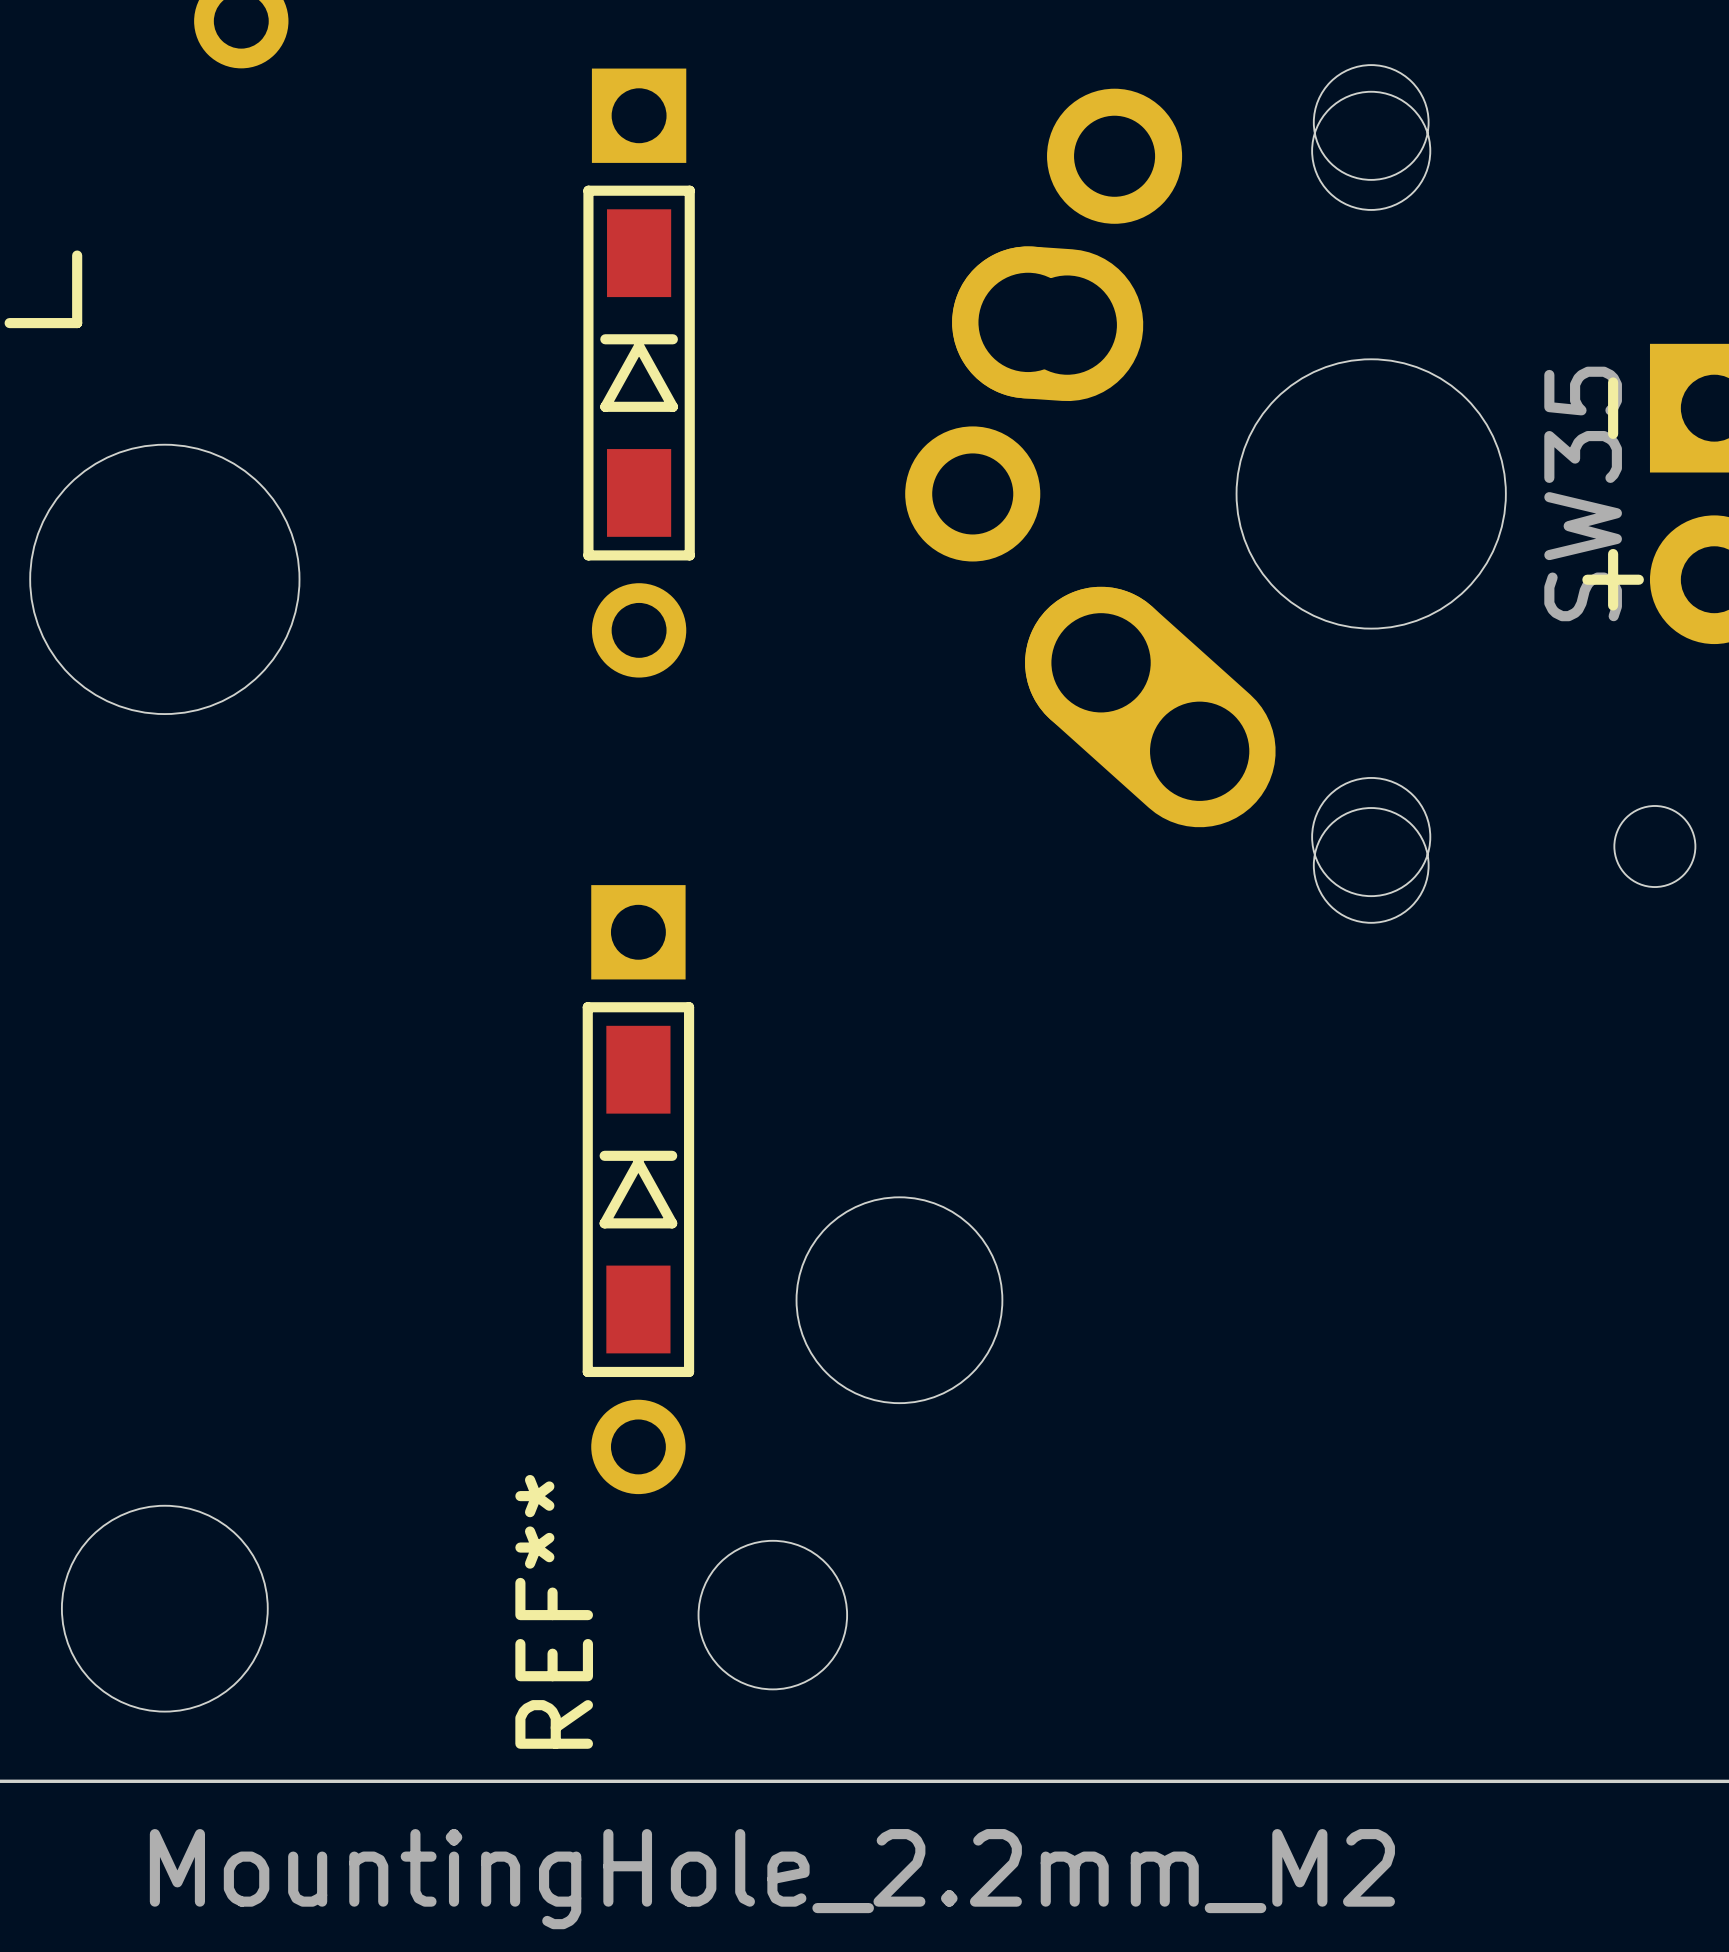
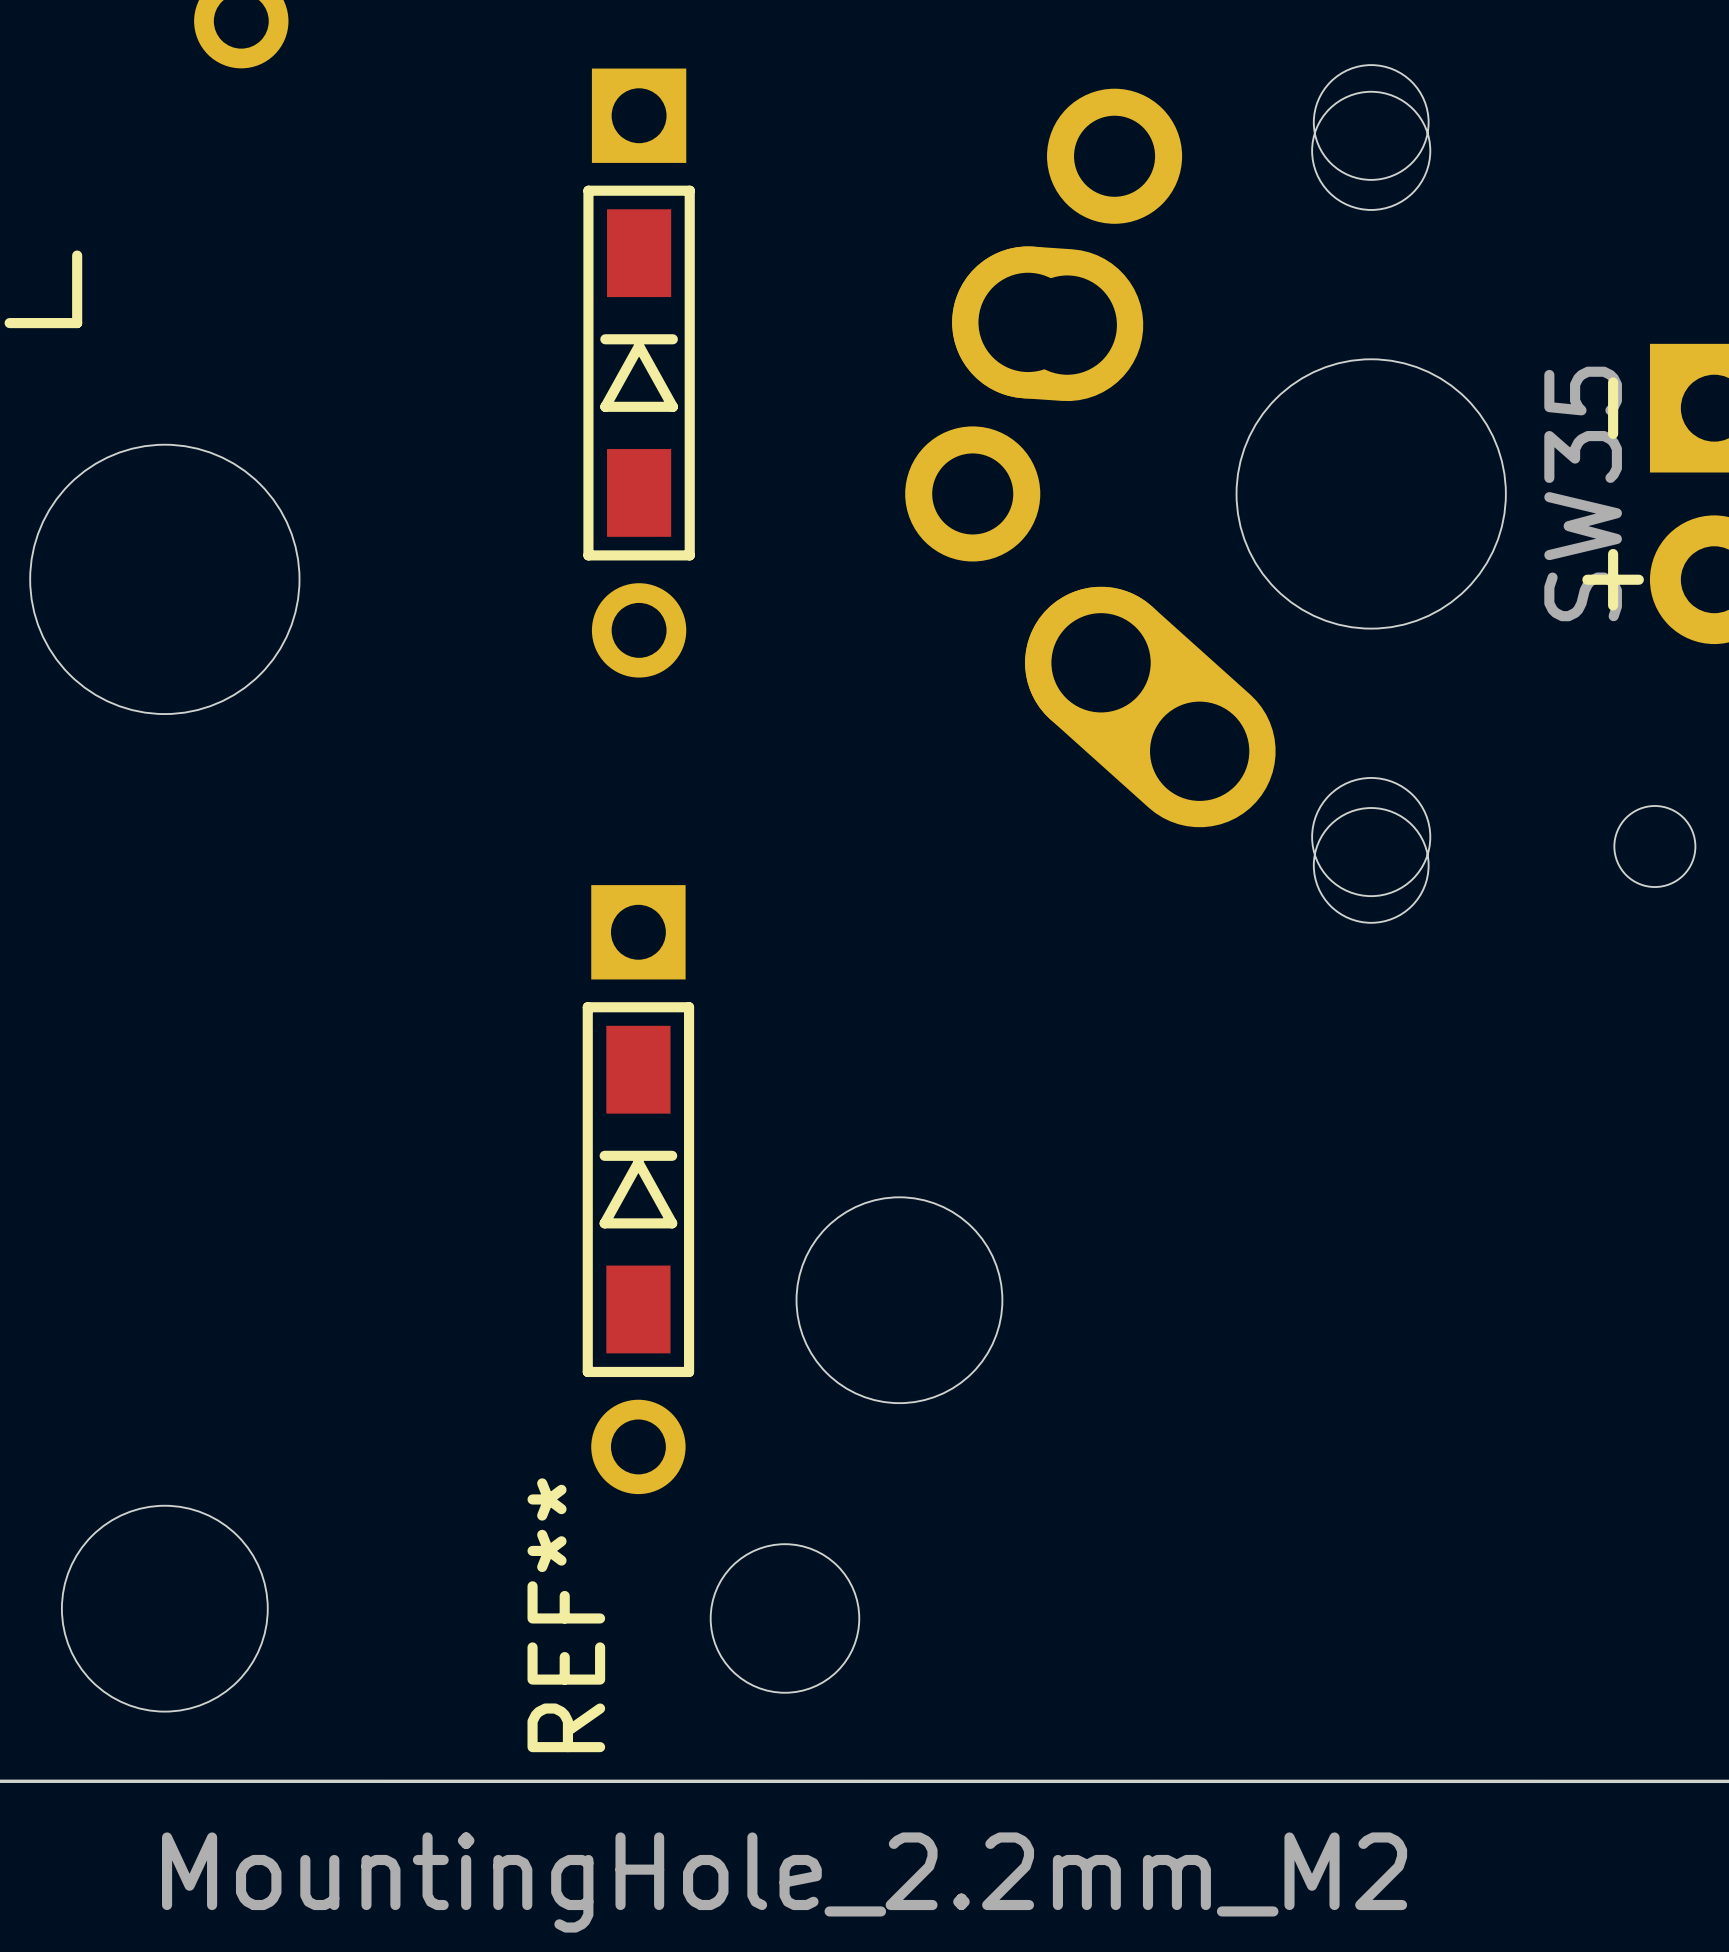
REF** position: (772, 1615) -> (784, 1618)

